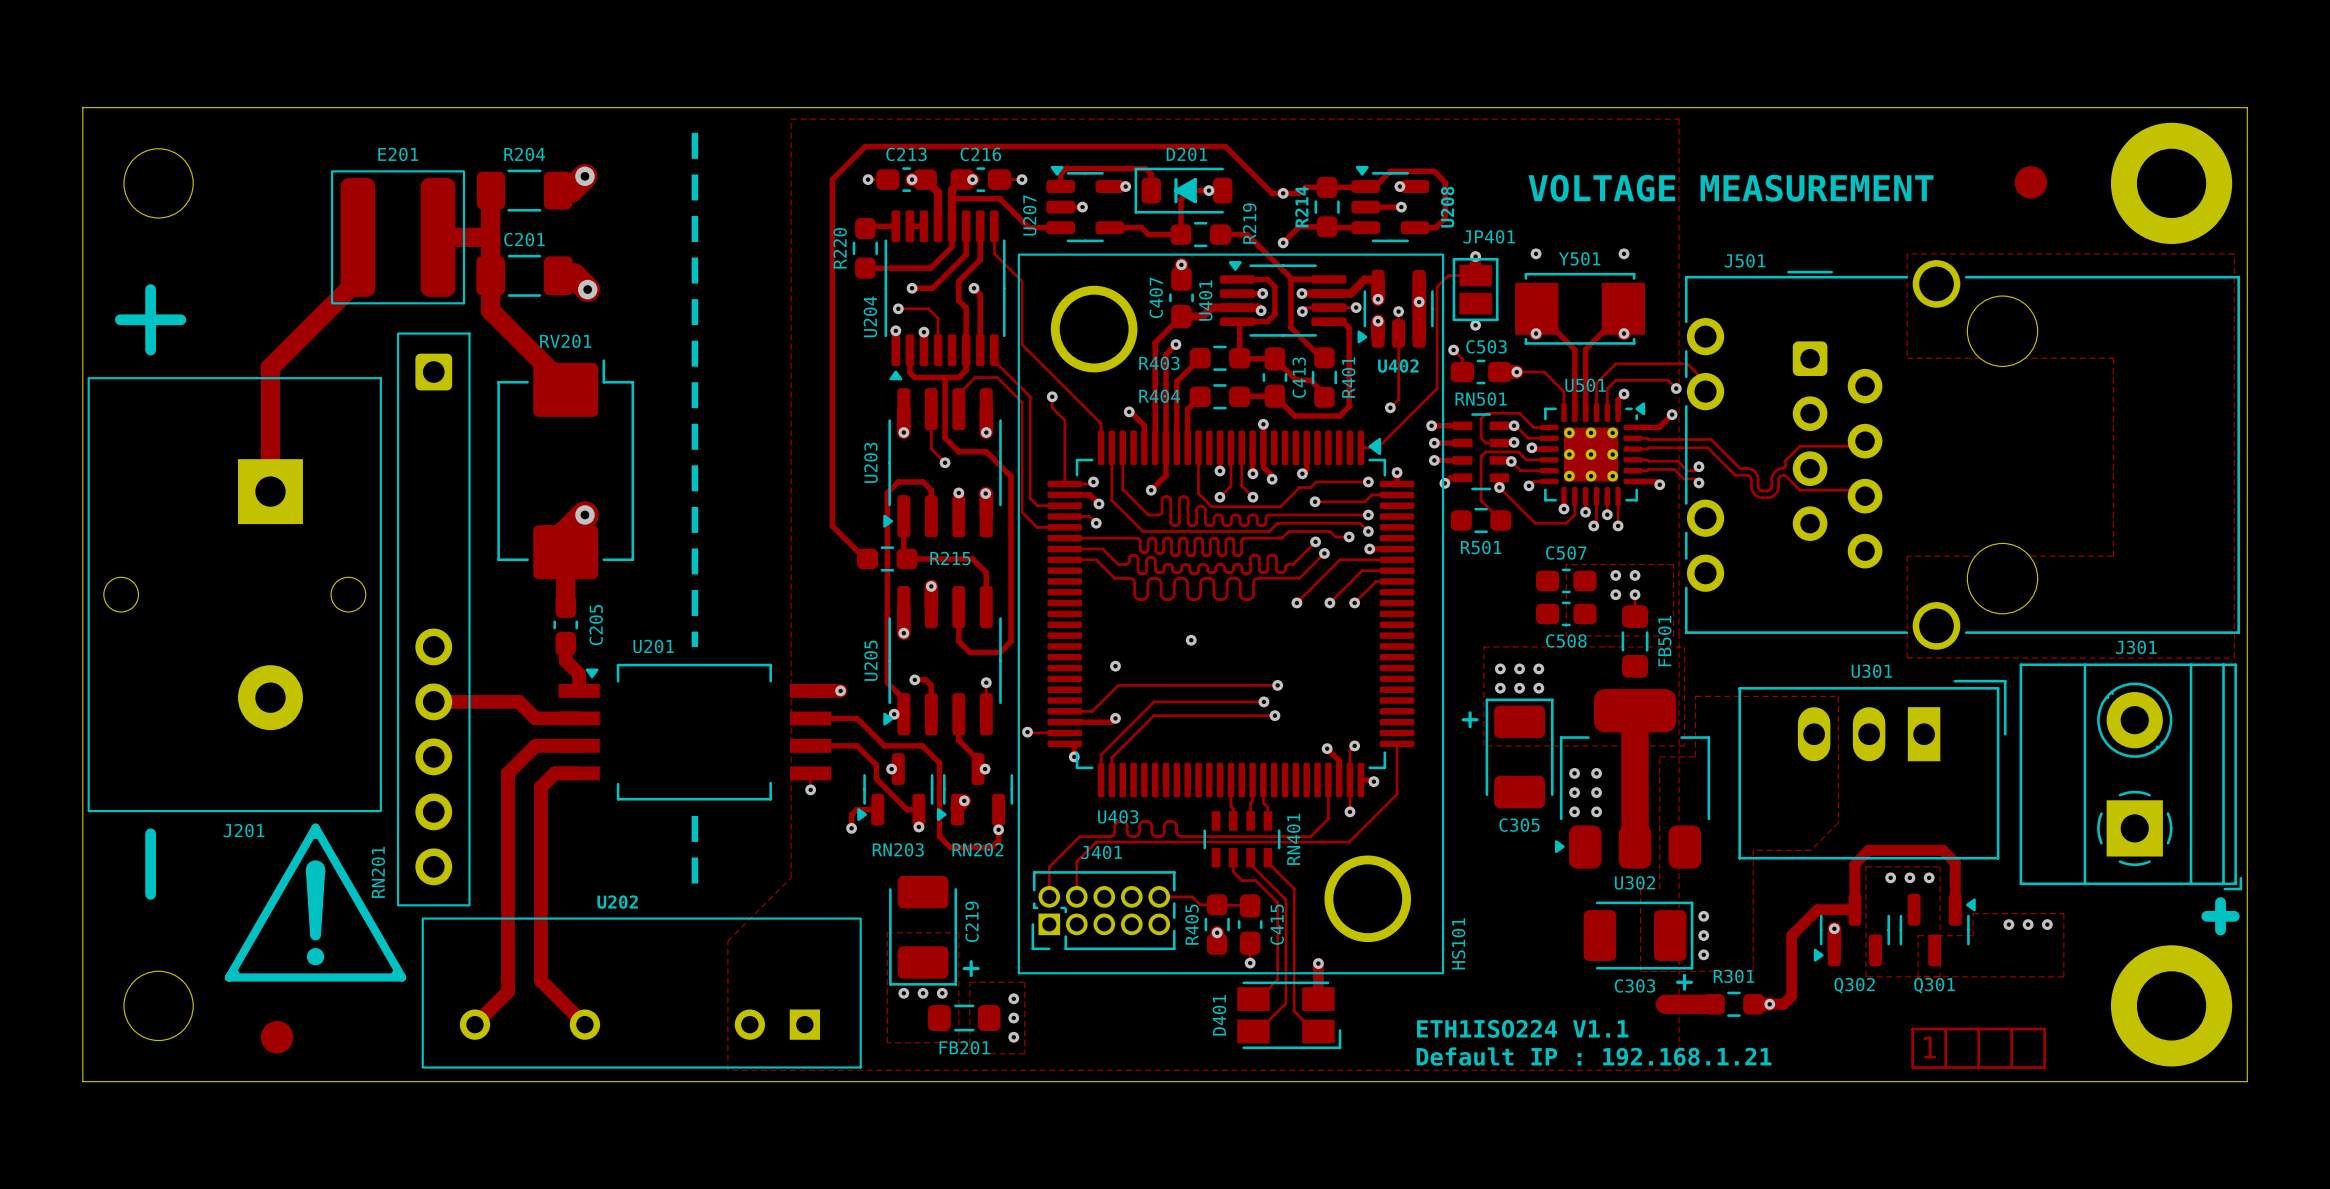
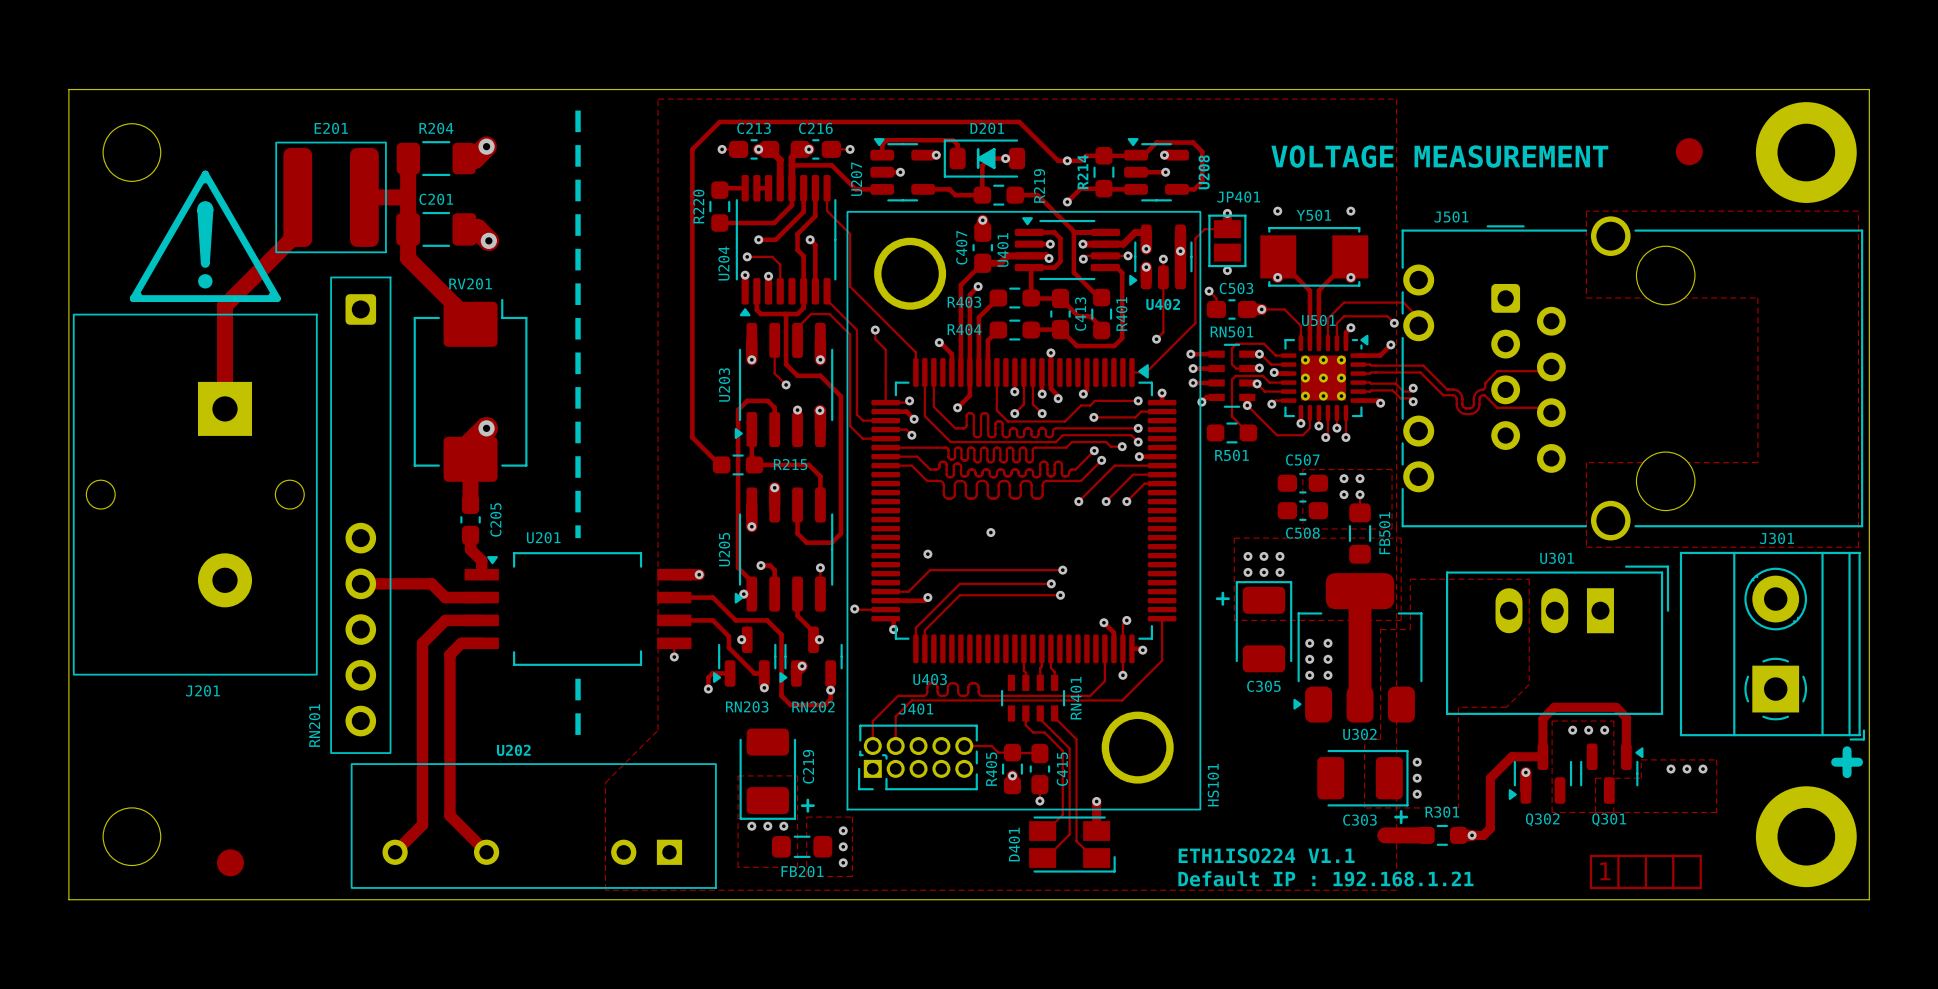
drawing: none -> [129, 170, 281, 303]
line: (150, 289) (150, 350) -> none
line: (120, 319) (180, 319) -> none
drawing: [224, 823, 407, 982] -> none
line: (150, 833) (150, 894) -> none

